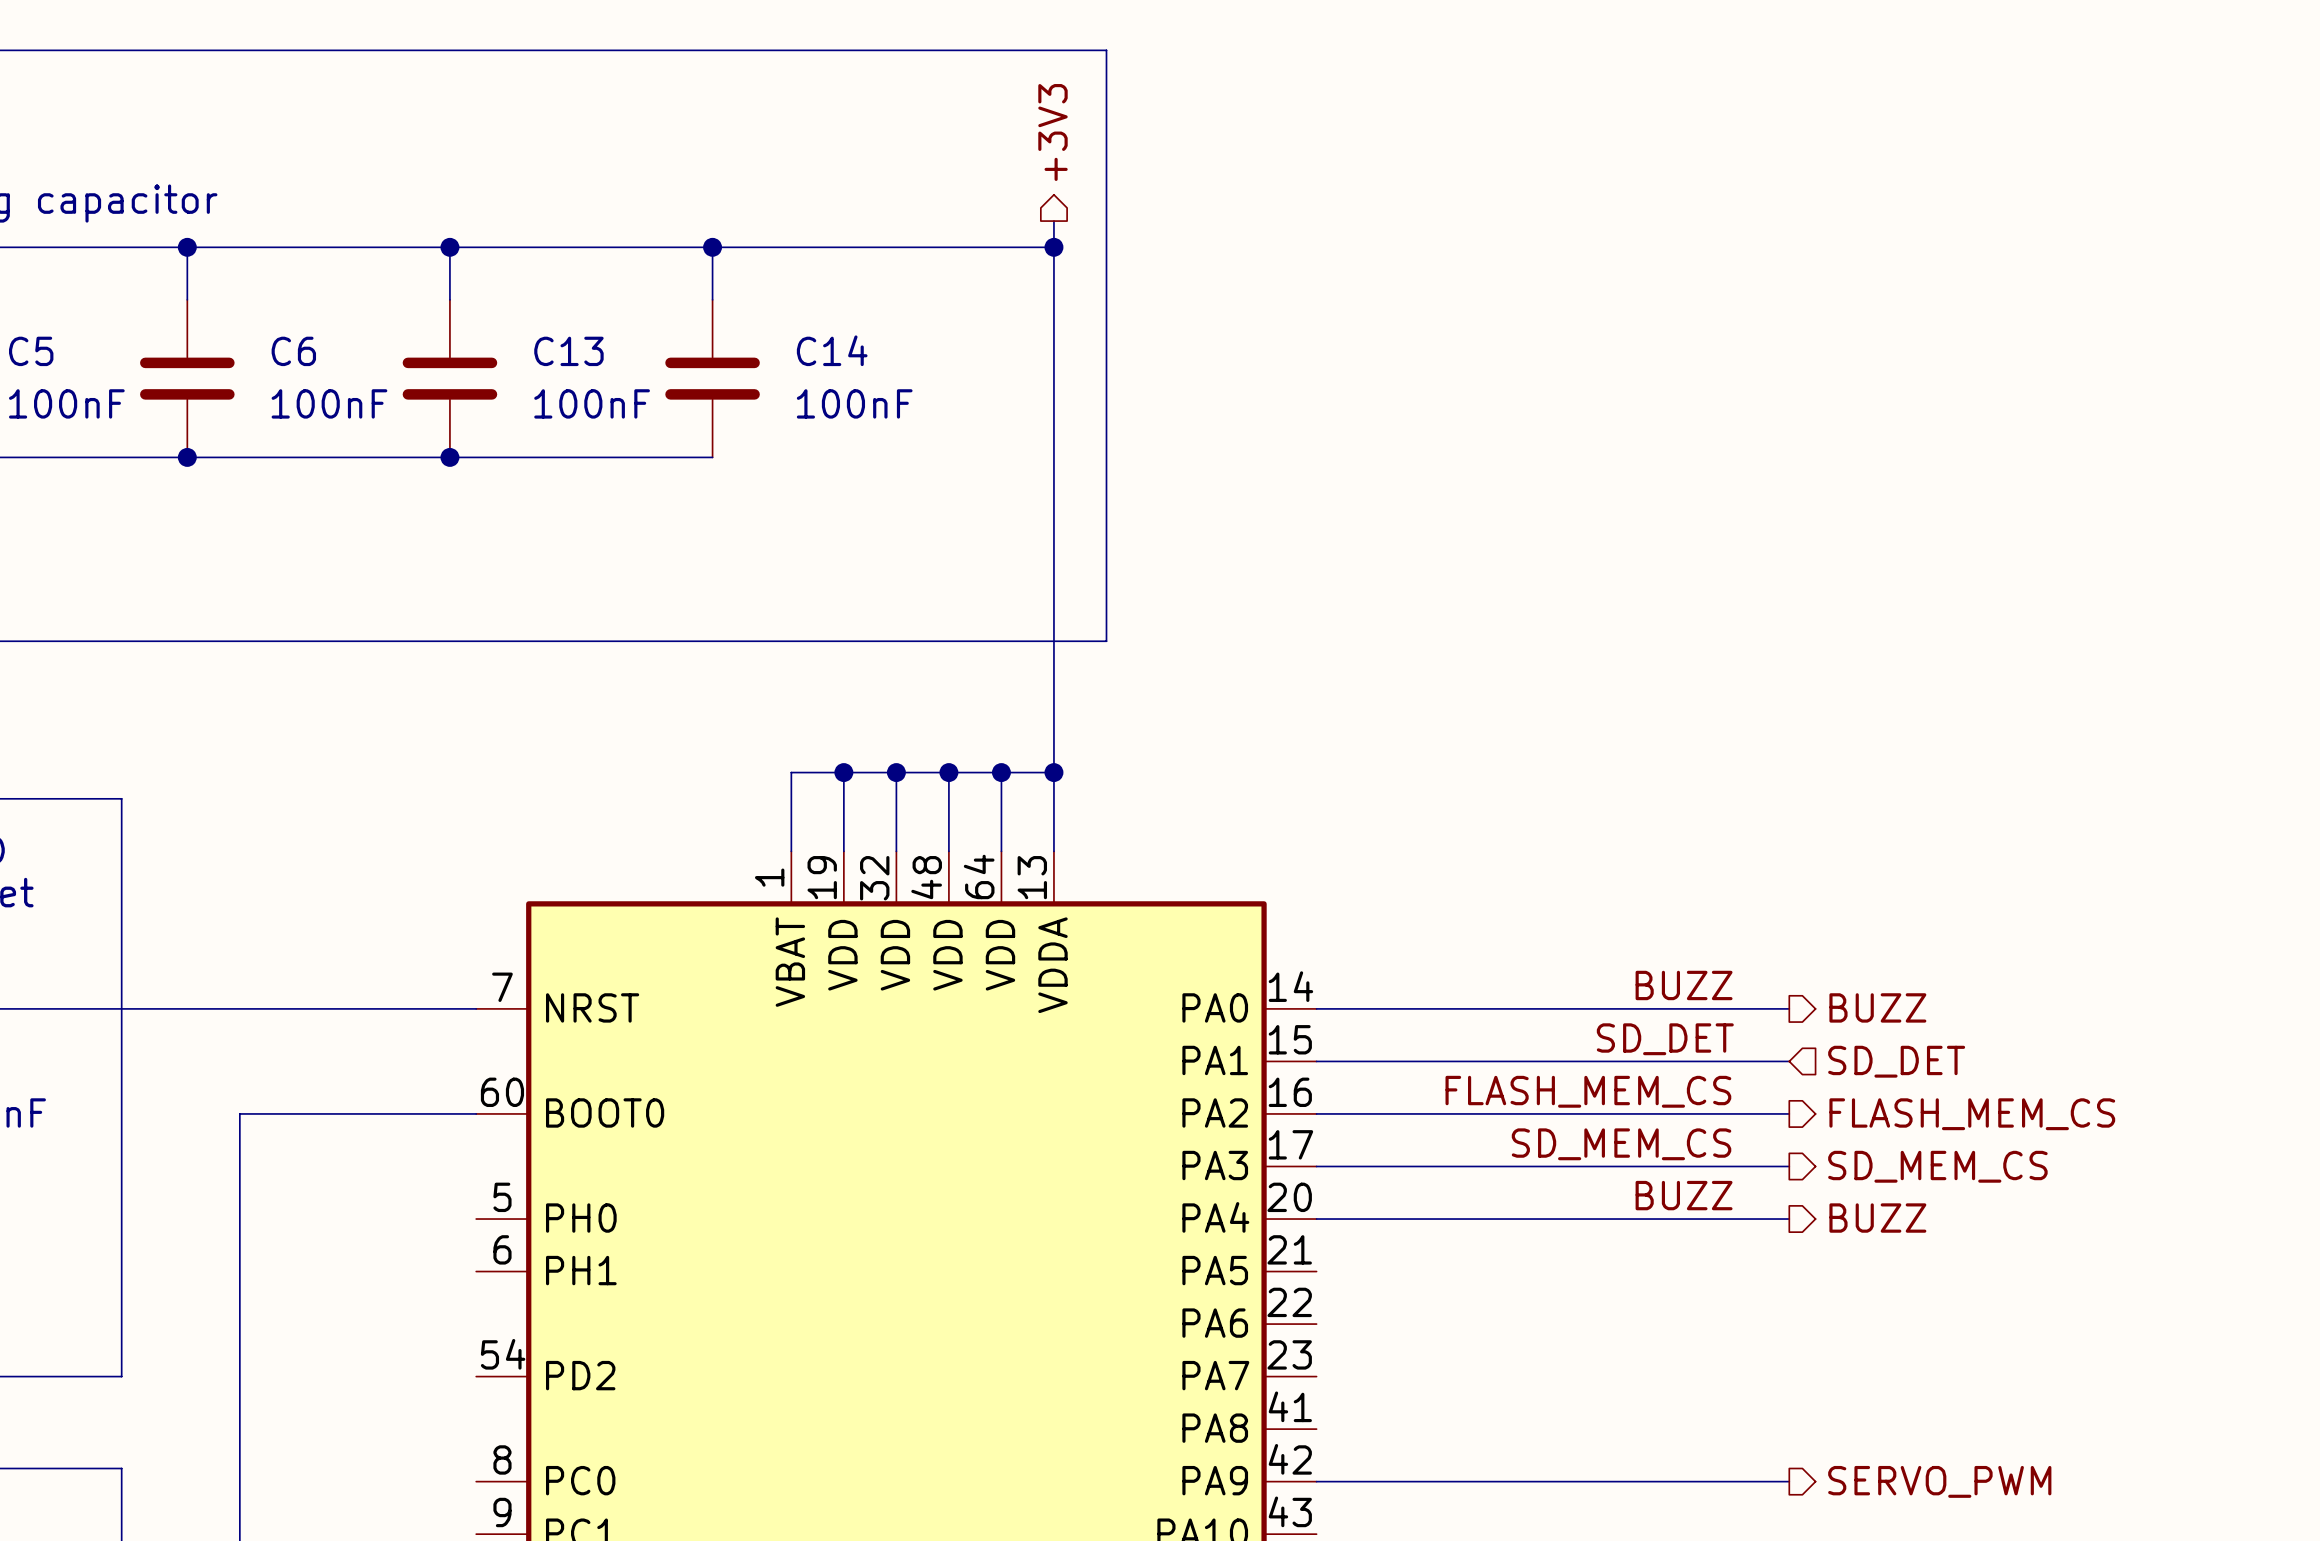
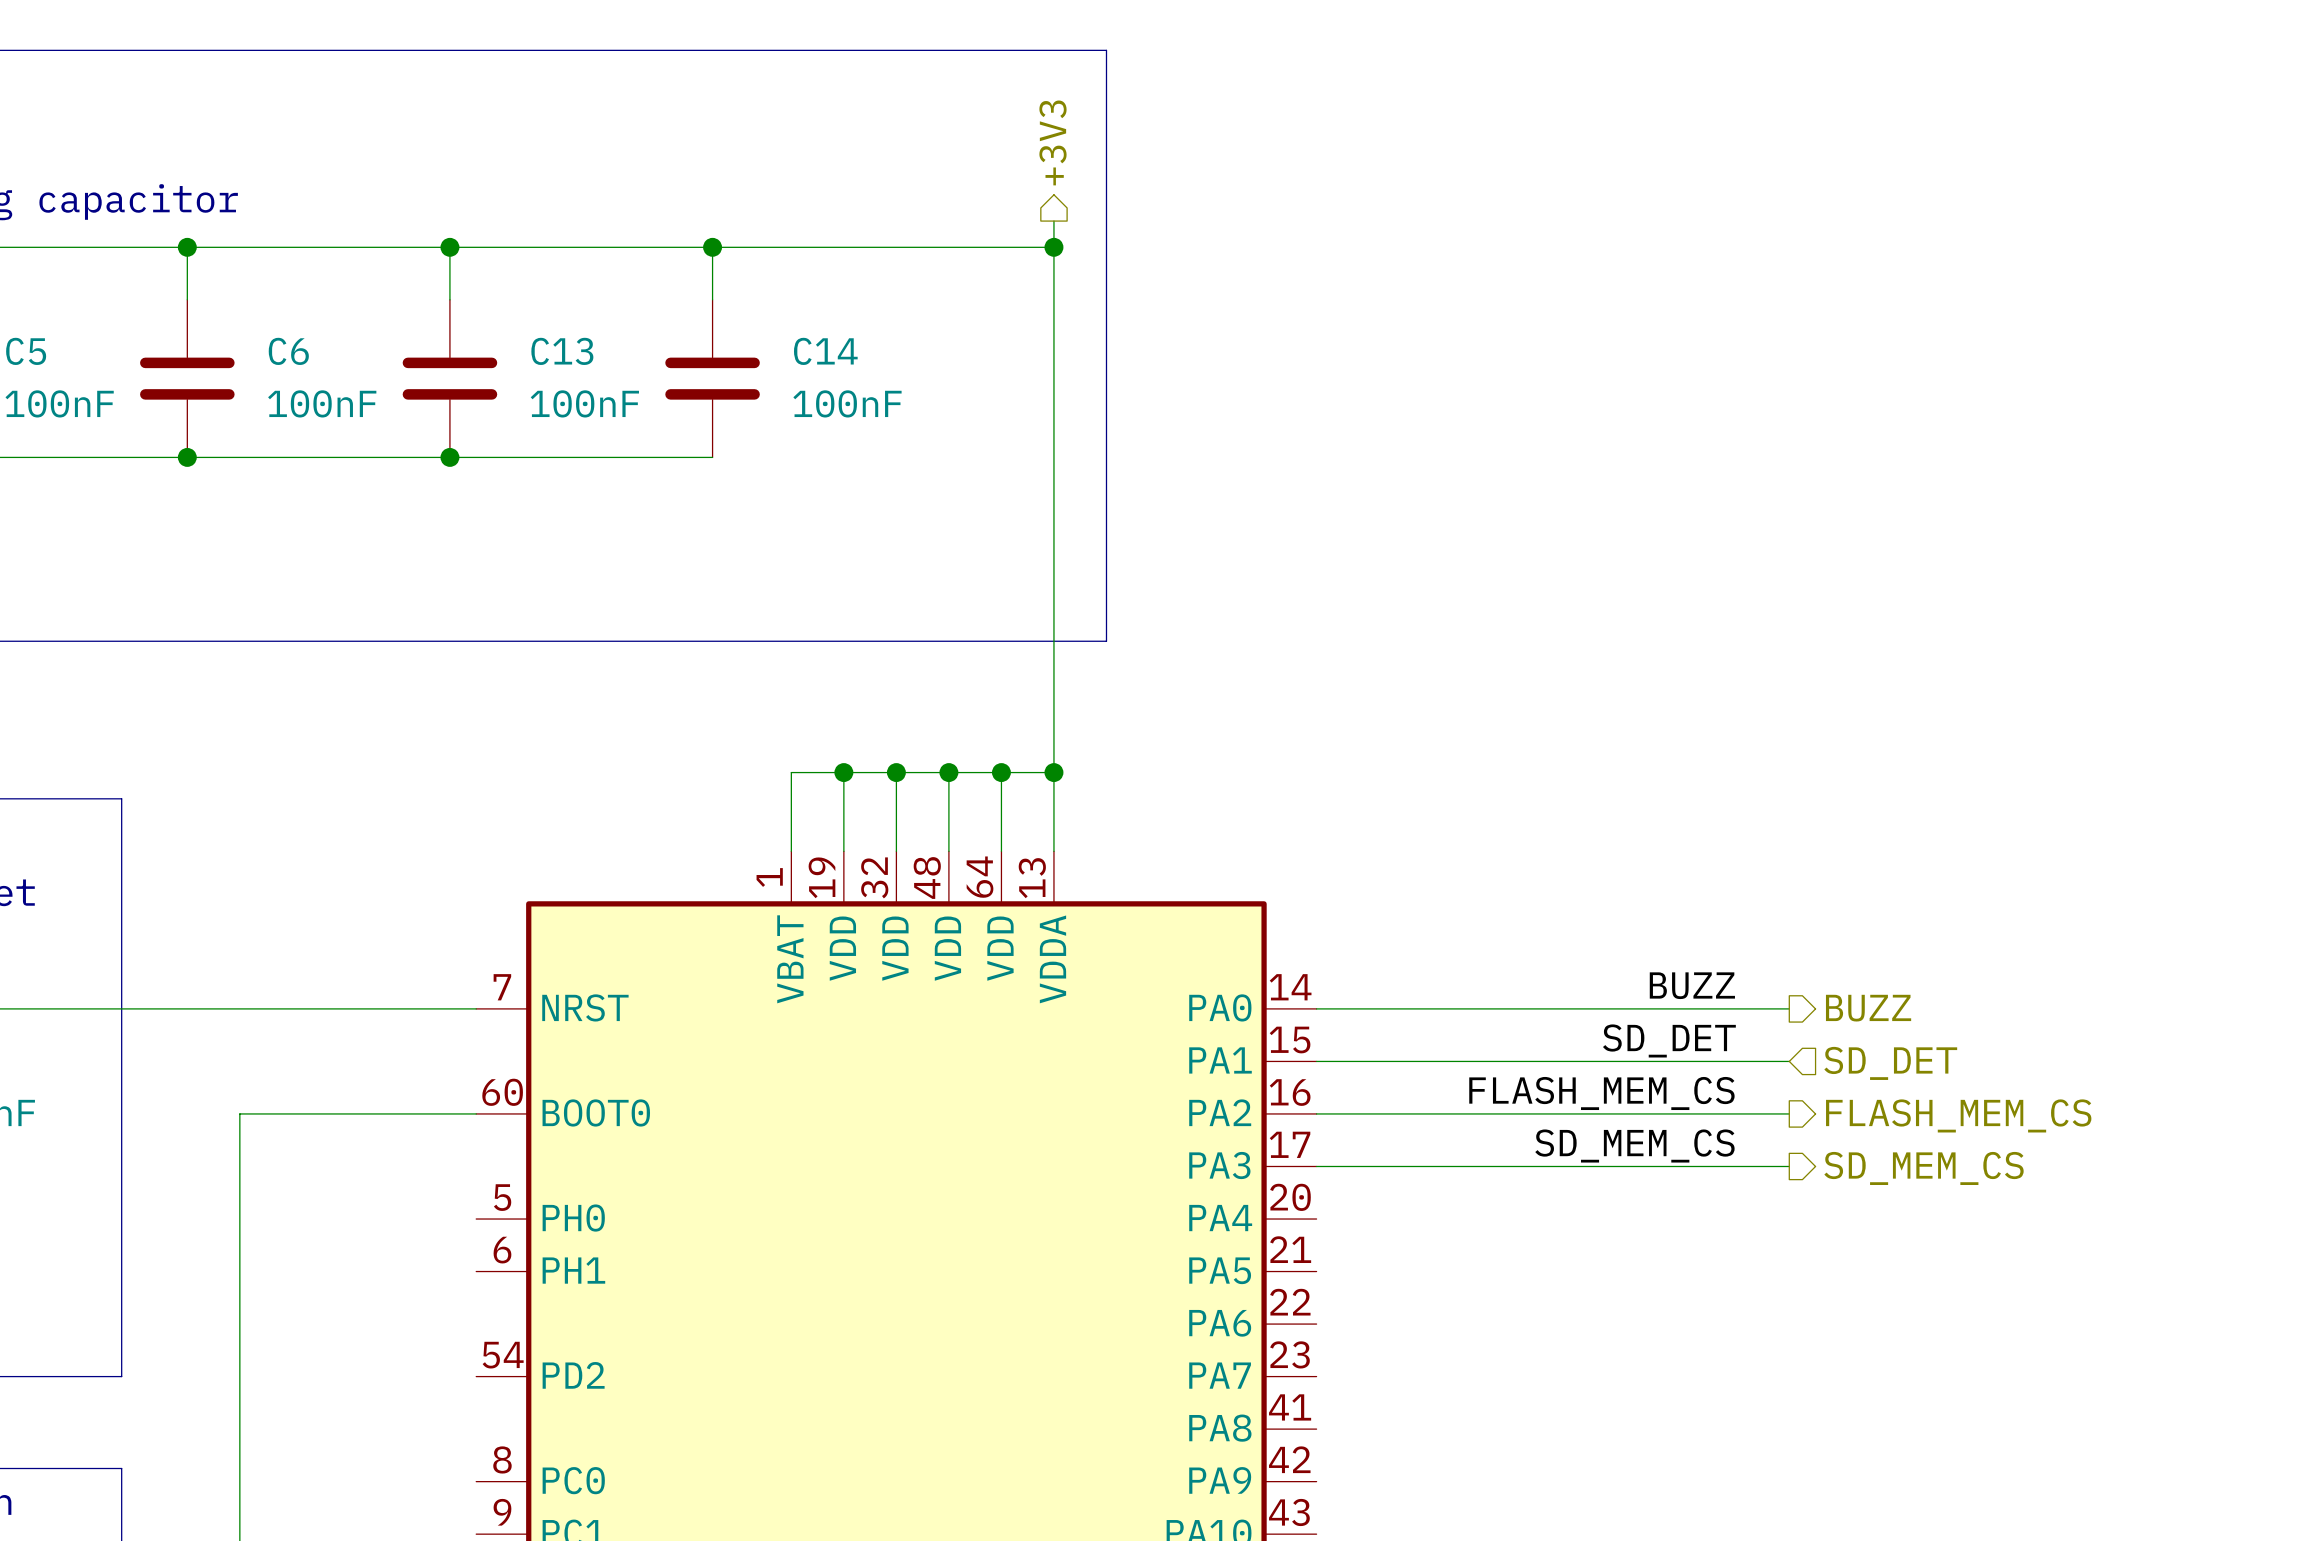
label: BUZZ (1684, 1195) -> none
hierarchical label: BUZZ (1877, 1218) -> none
wire: (1316, 1219) (1789, 1219) -> none
wire: (1316, 1481) (1789, 1481) -> none
hierarchical label: SERVO_PWM (1939, 1481) -> none

